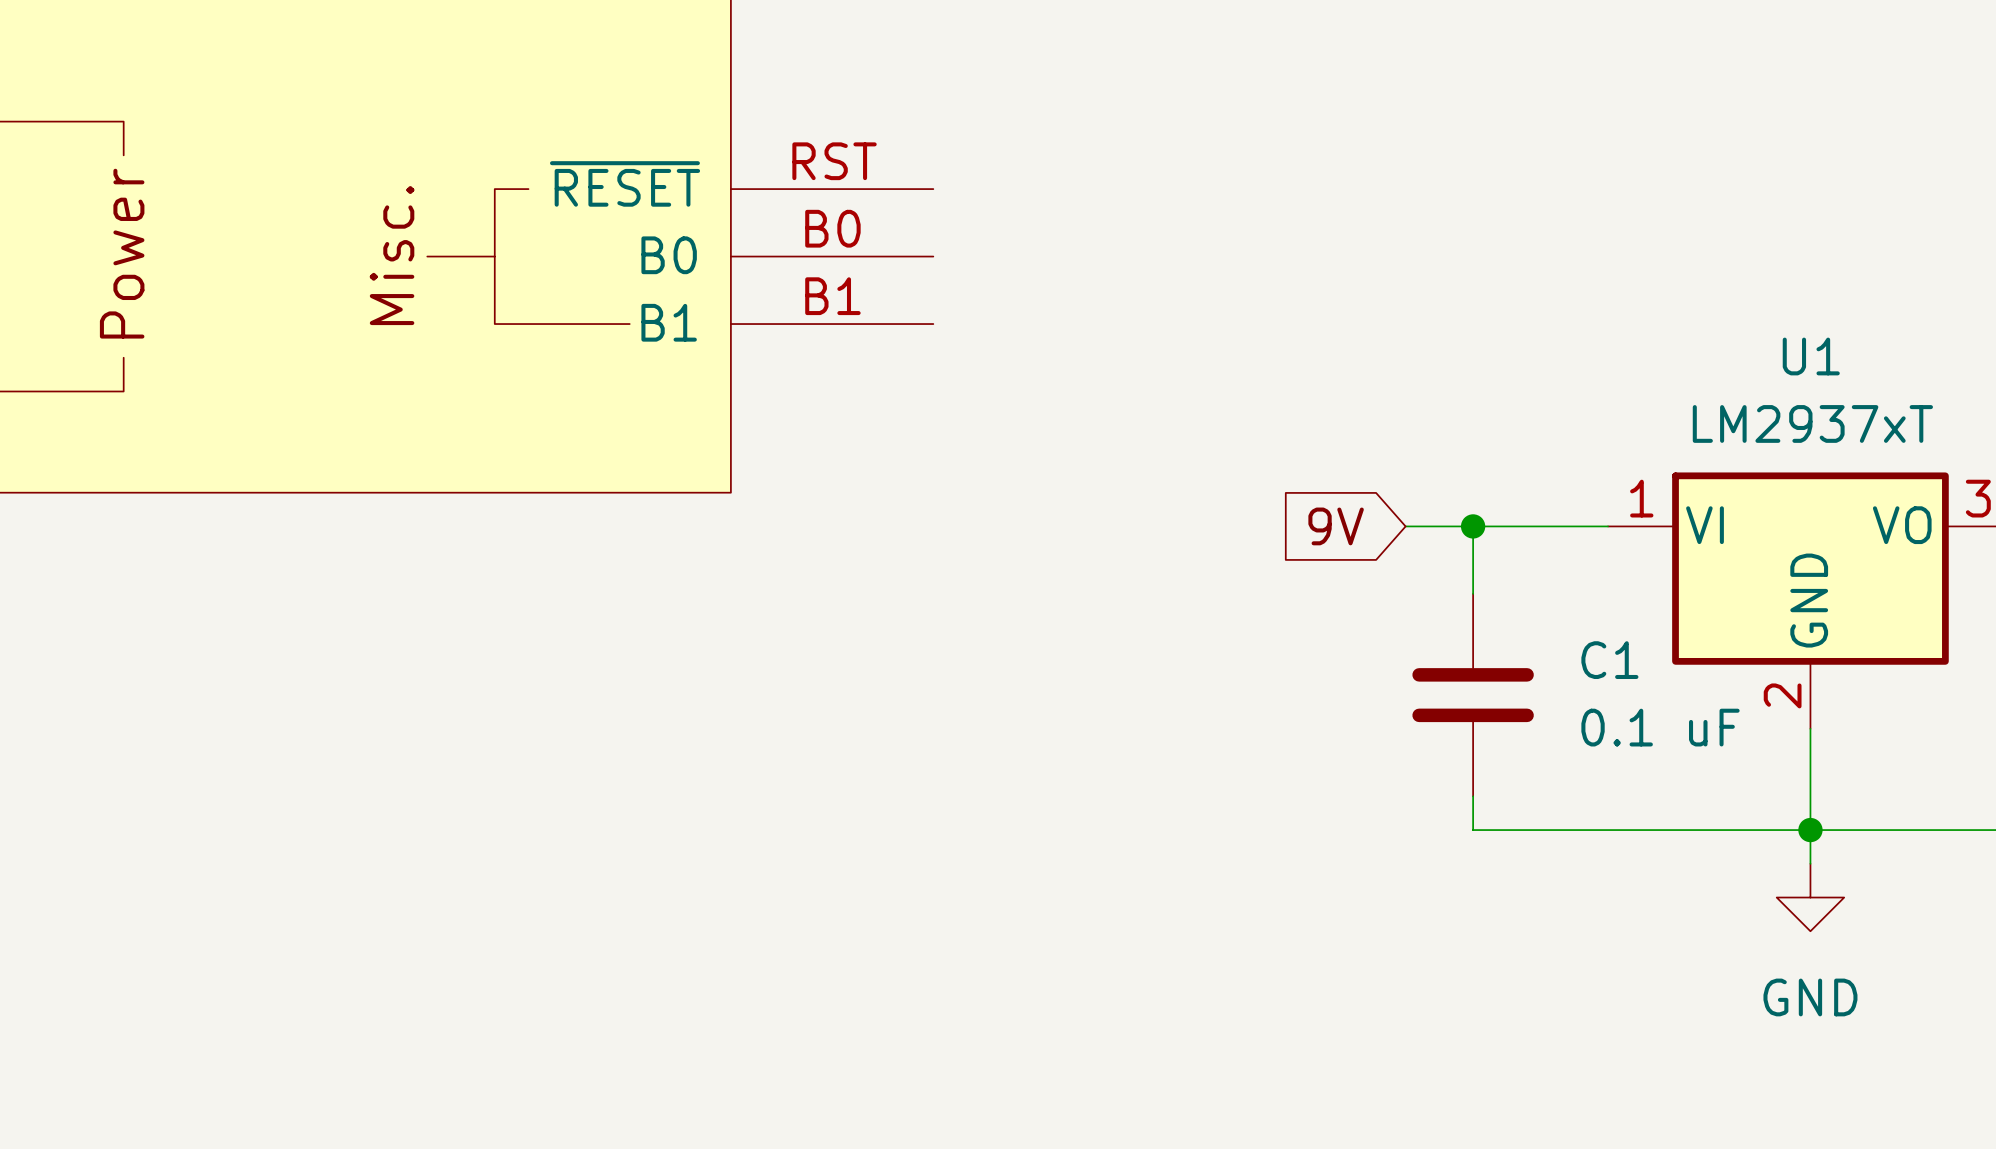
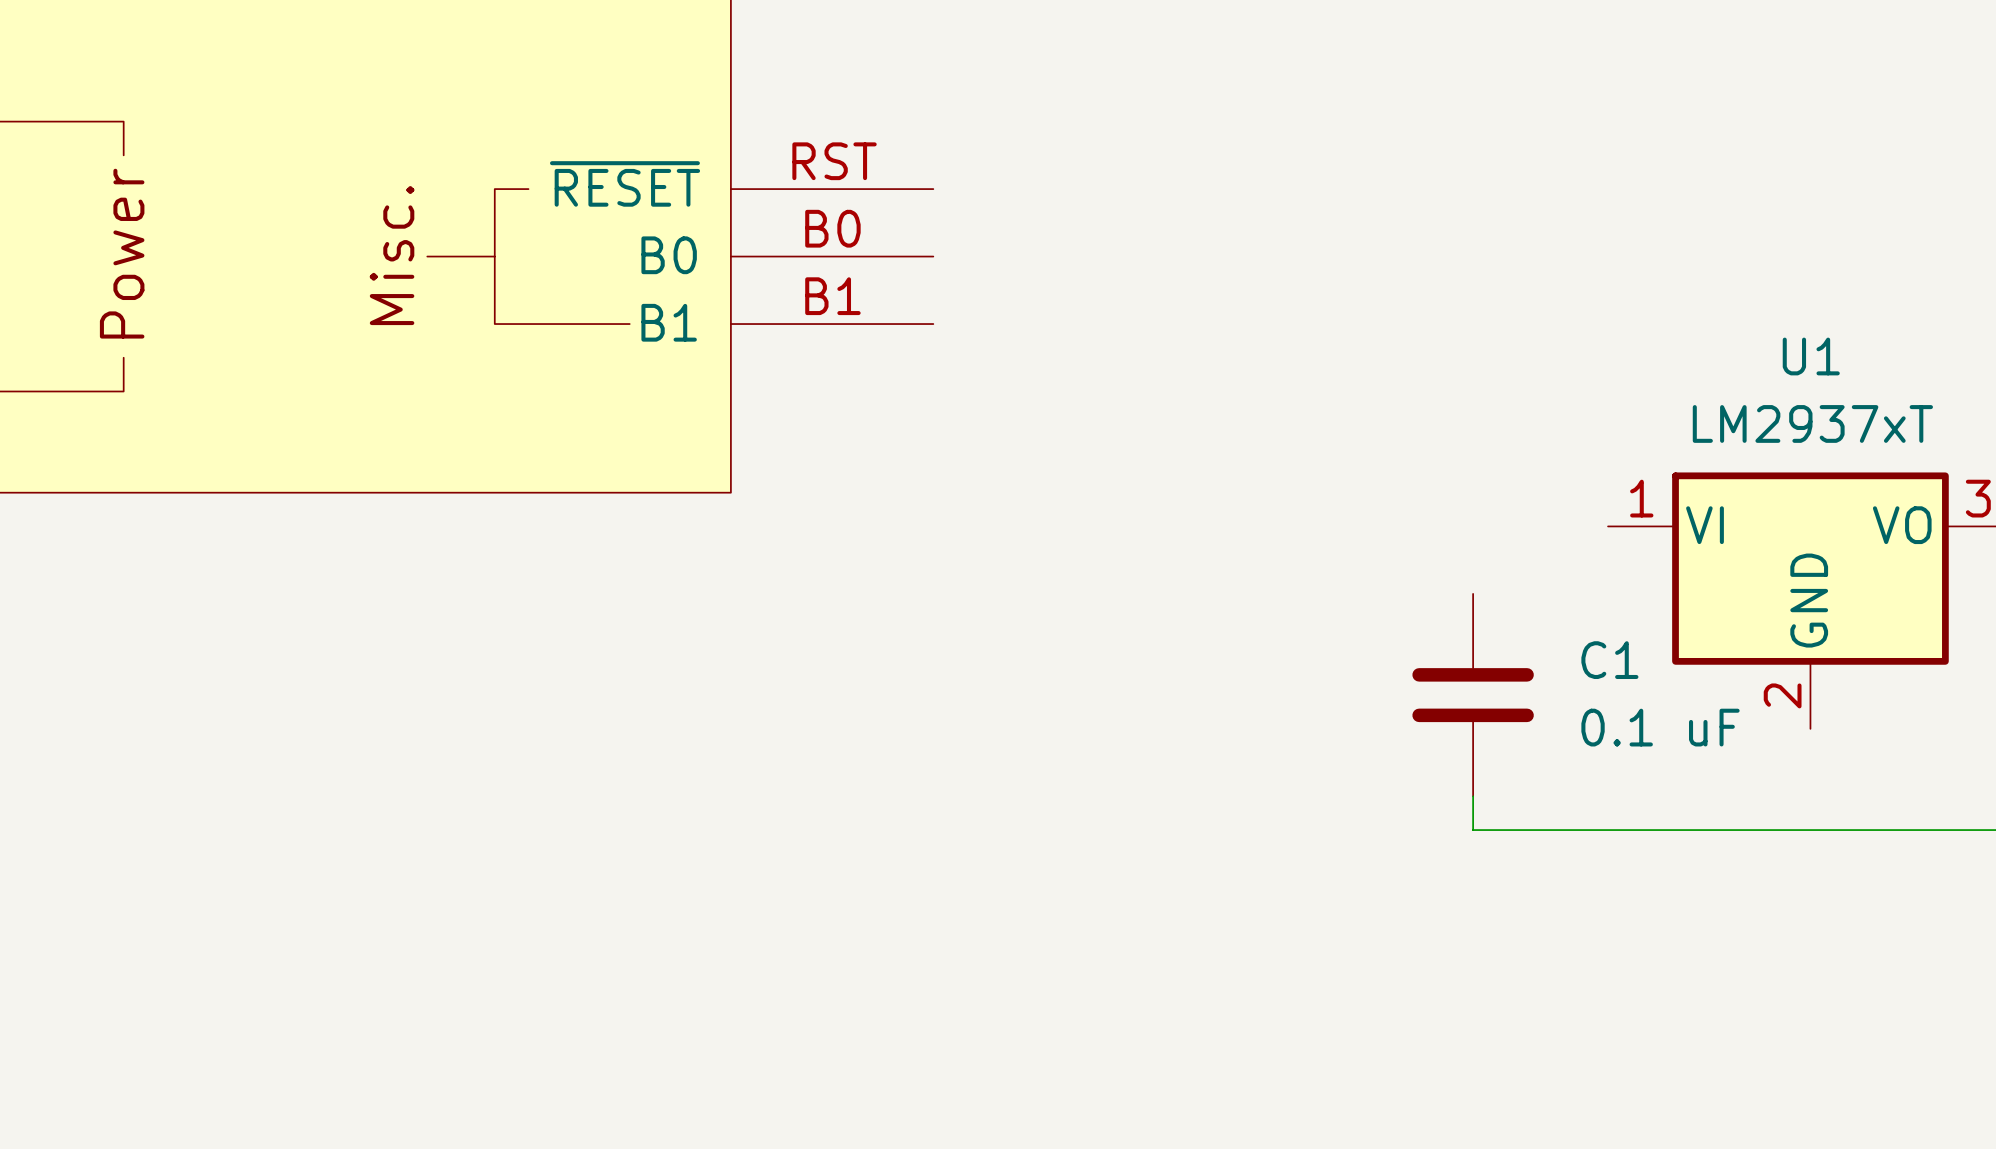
global label: 9V (1336, 526) -> none
wire: (1405, 526) (1608, 526) -> none
wire: (1473, 526) (1473, 593) -> none
junction: (1473, 526) -> none
wire: (1810, 728) (1810, 863) -> none
junction: (1810, 830) -> none
power symbol: GND (1810, 897) -> none

